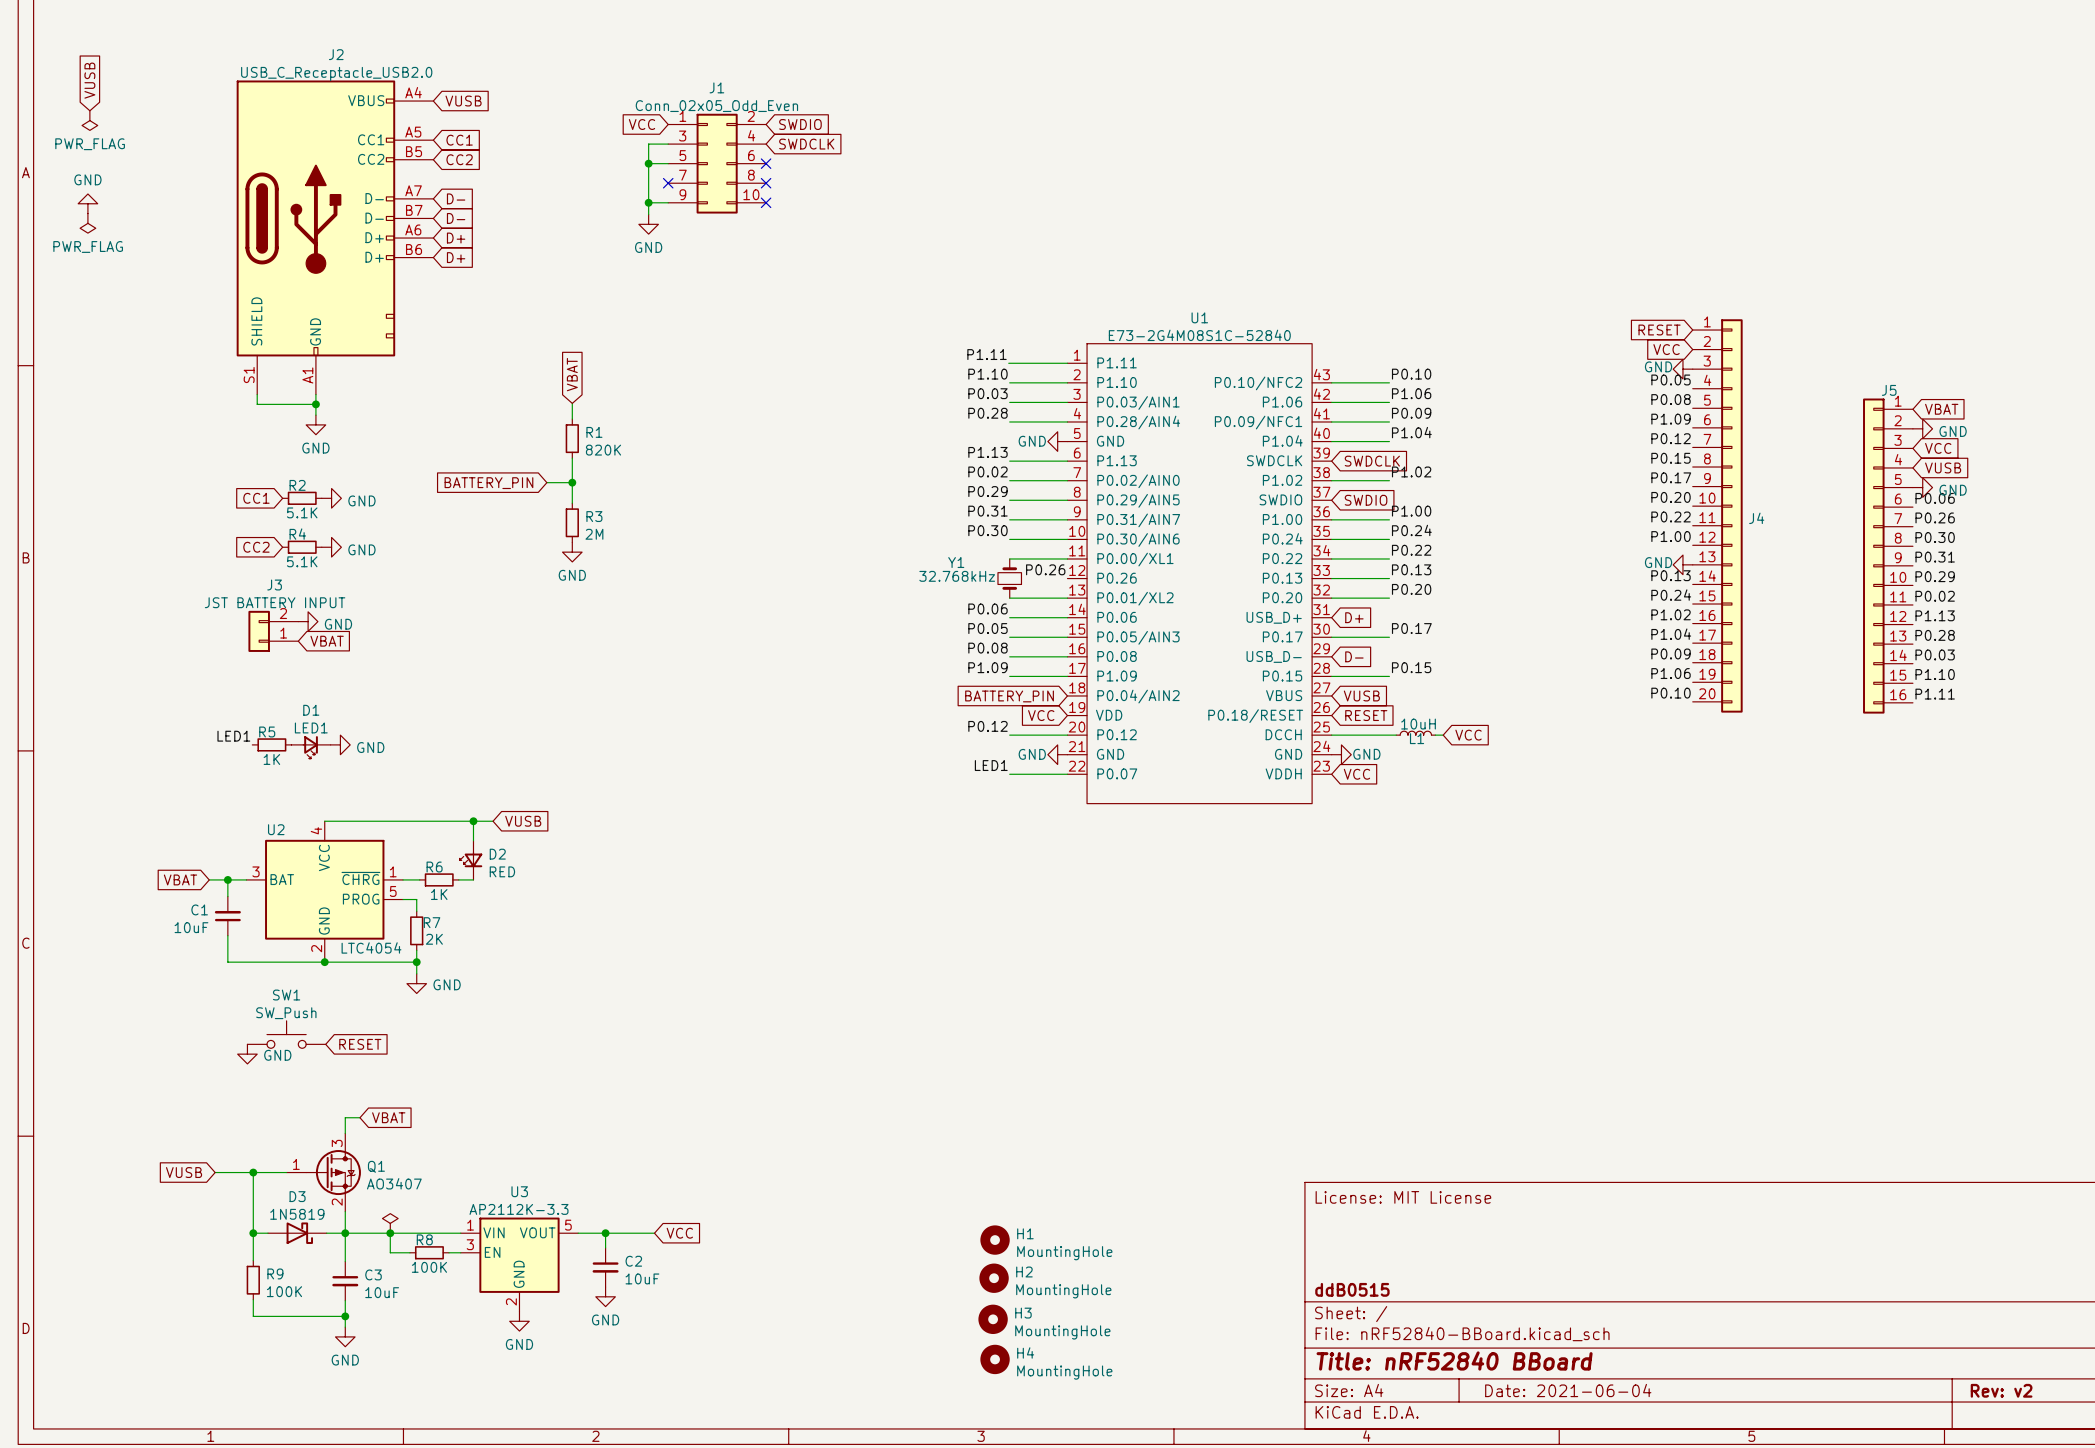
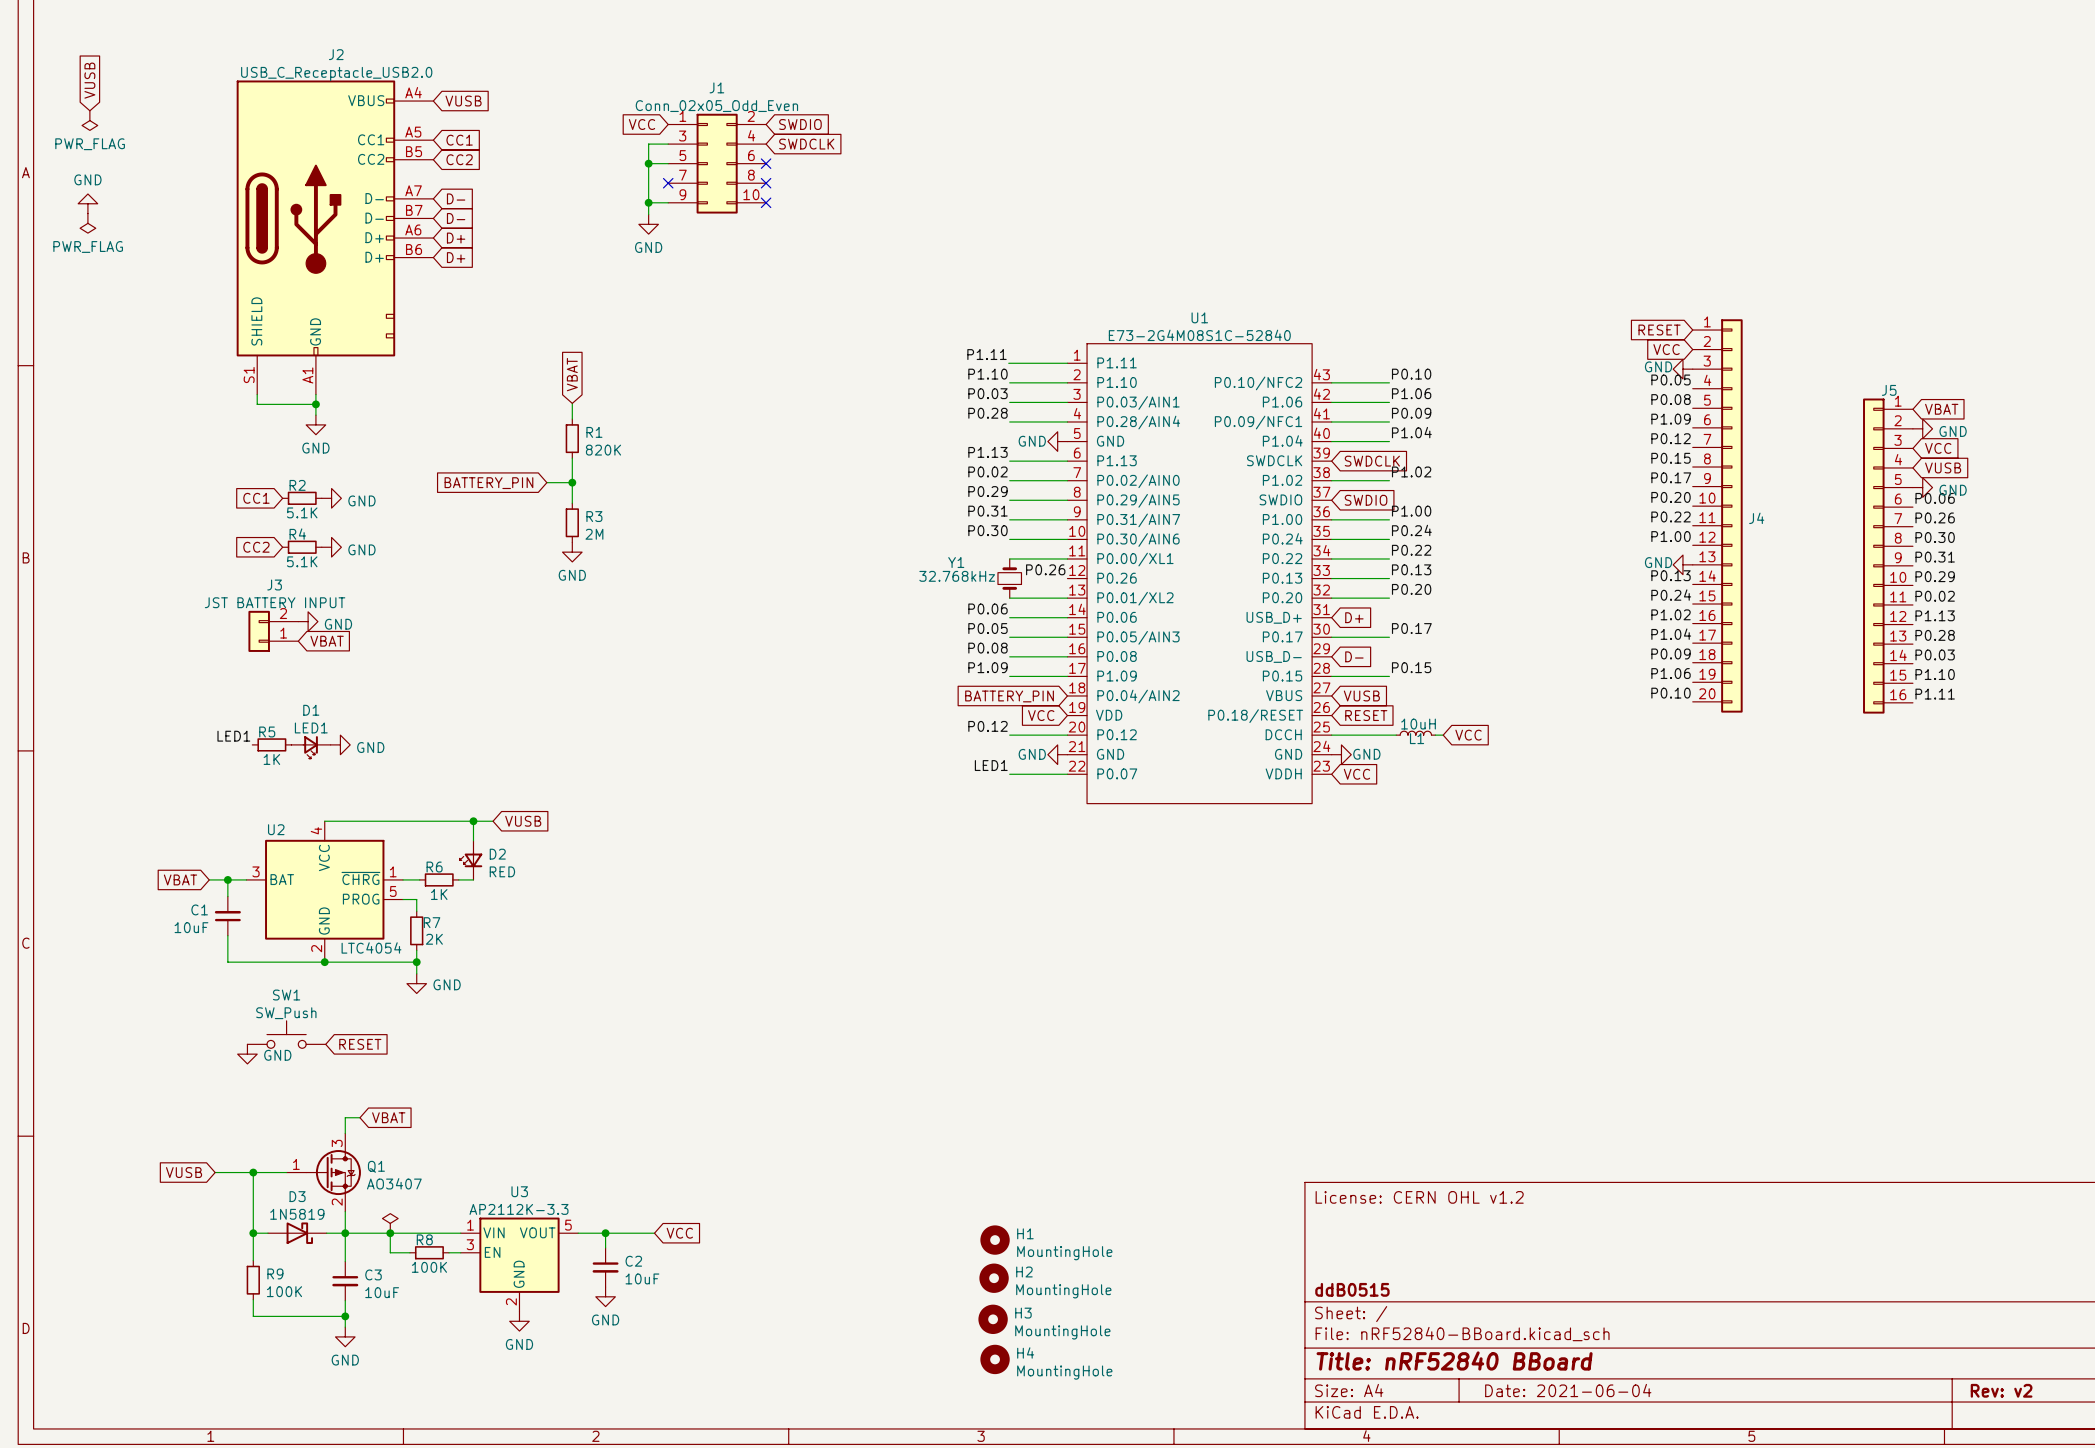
title block: License: MIT License (1403, 1197) -> License: CERN OHL v1.2 (1419, 1197)

